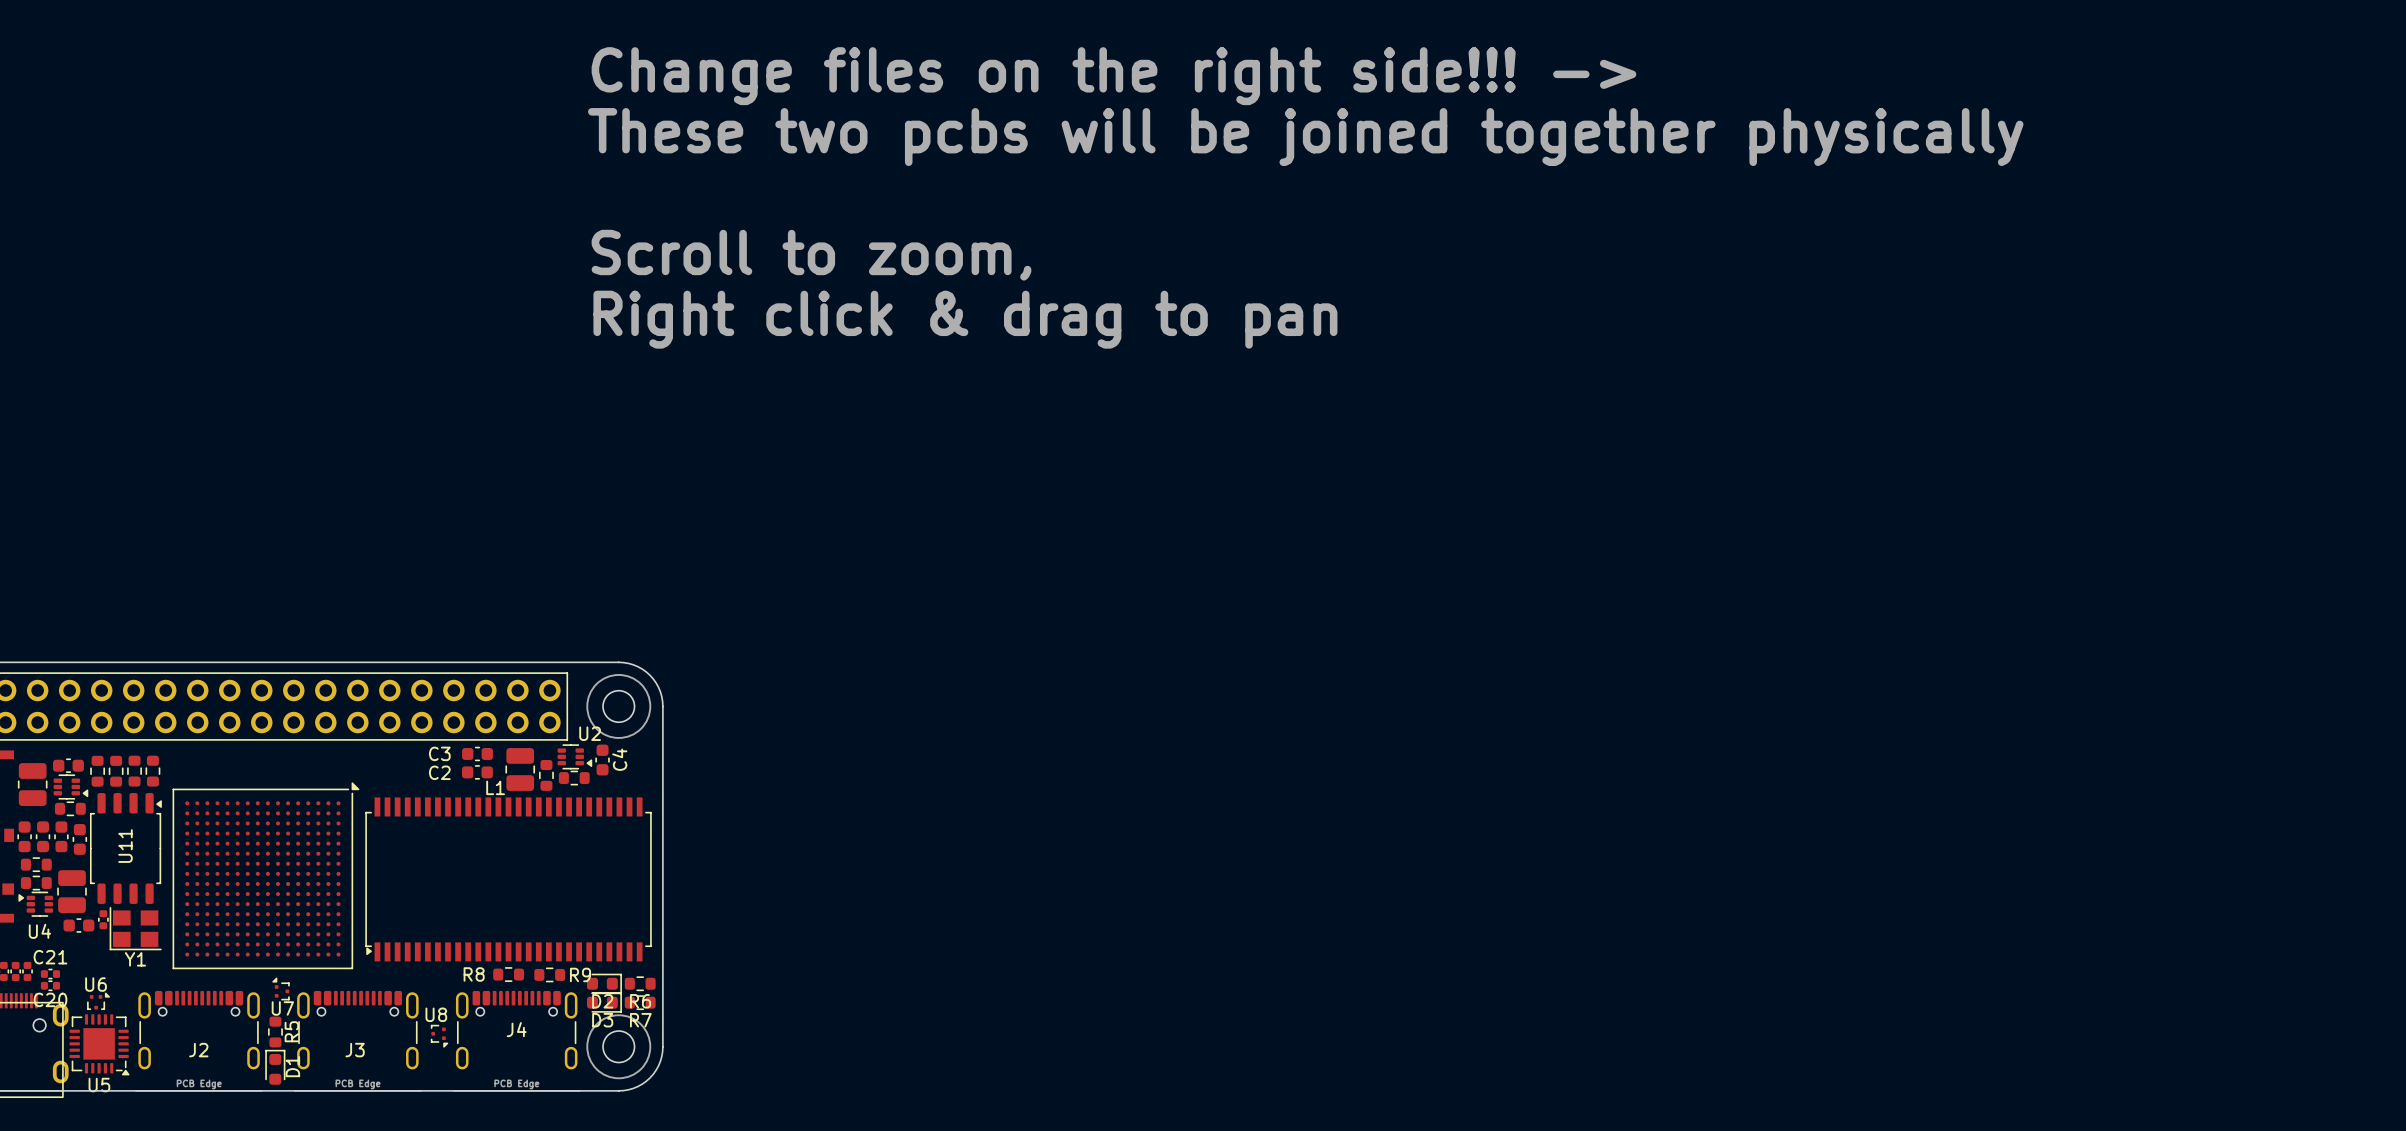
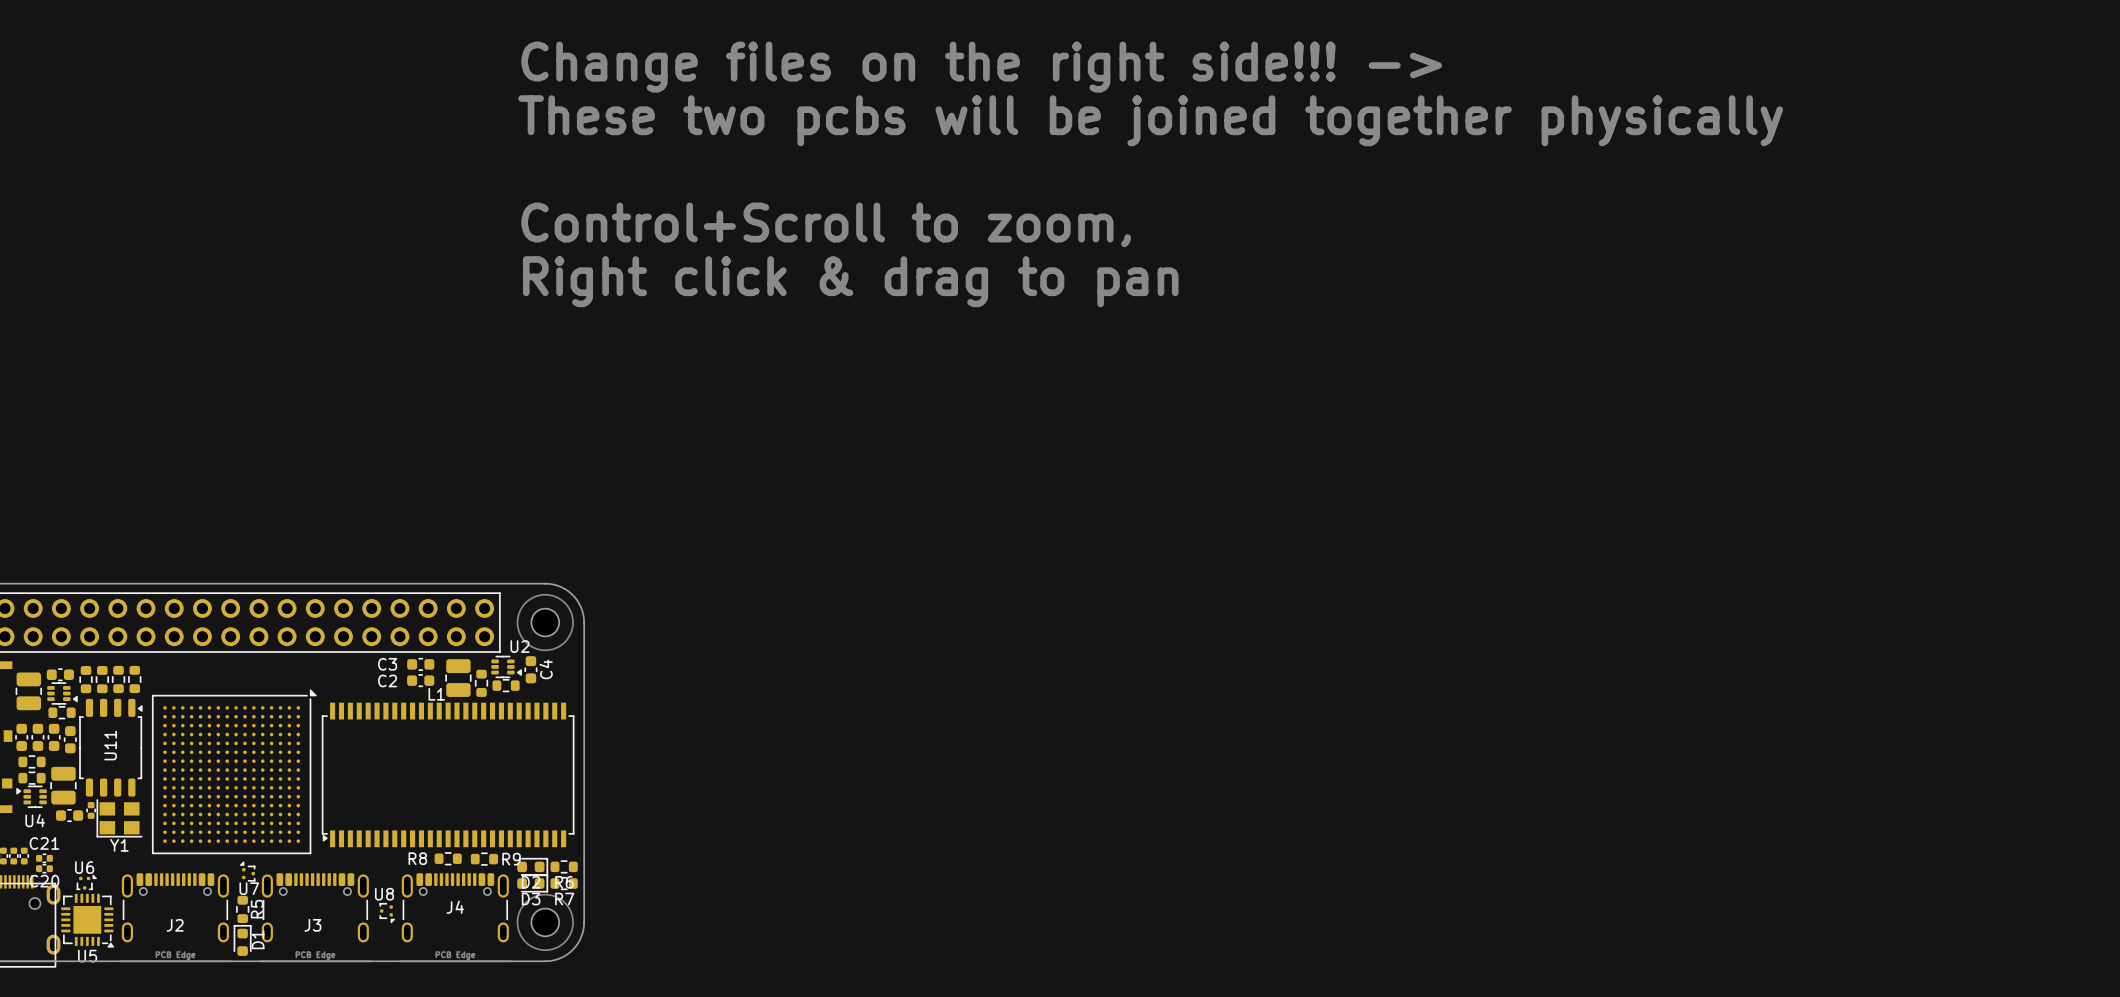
text: Scroll to zoom, (811, 255) -> Control+Scroll to zoom, (826, 224)

